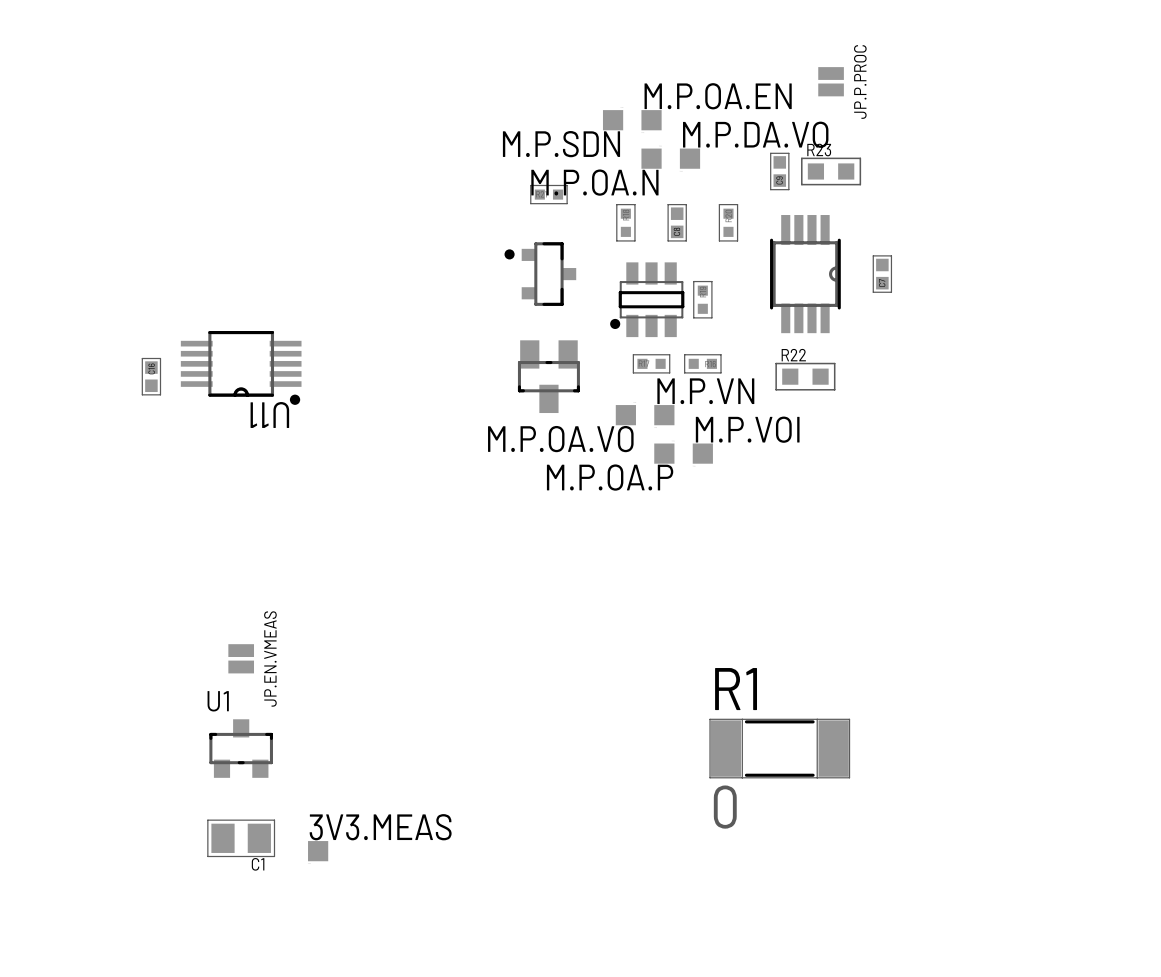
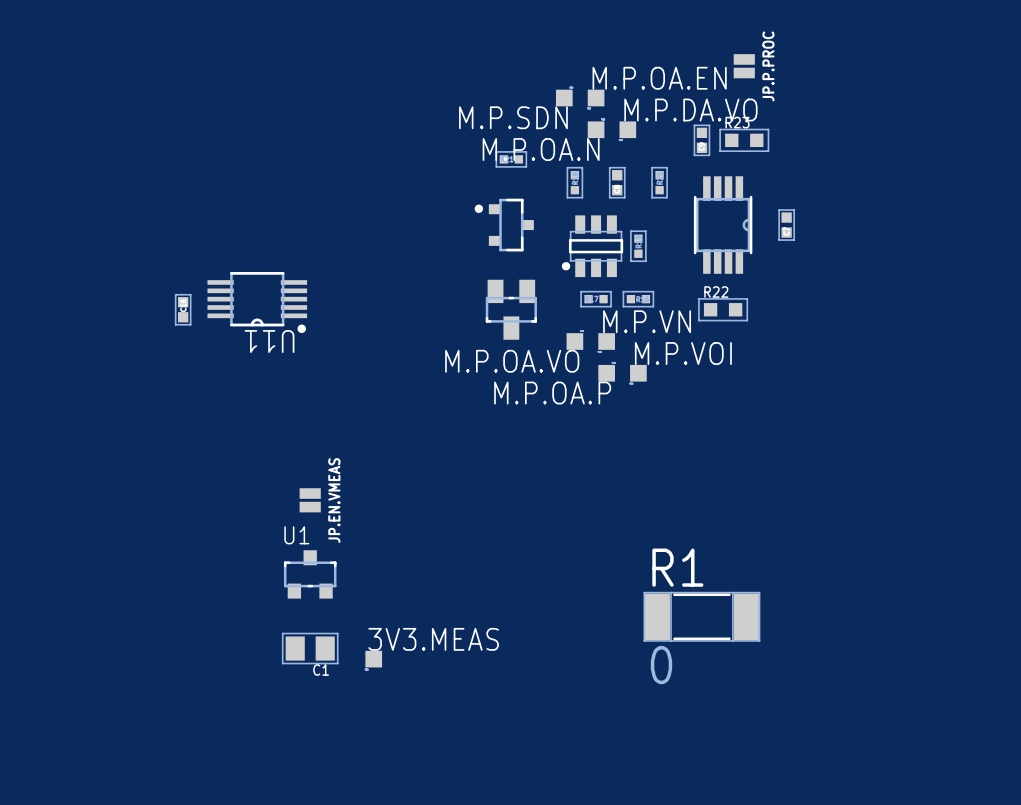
JP.EN.VMEAS position: (241, 658) -> (310, 500)
U1 position: (241, 748) -> (310, 574)
C1 position: (241, 838) -> (310, 648)
3V3.MEAS position: (318, 851) -> (373, 659)

